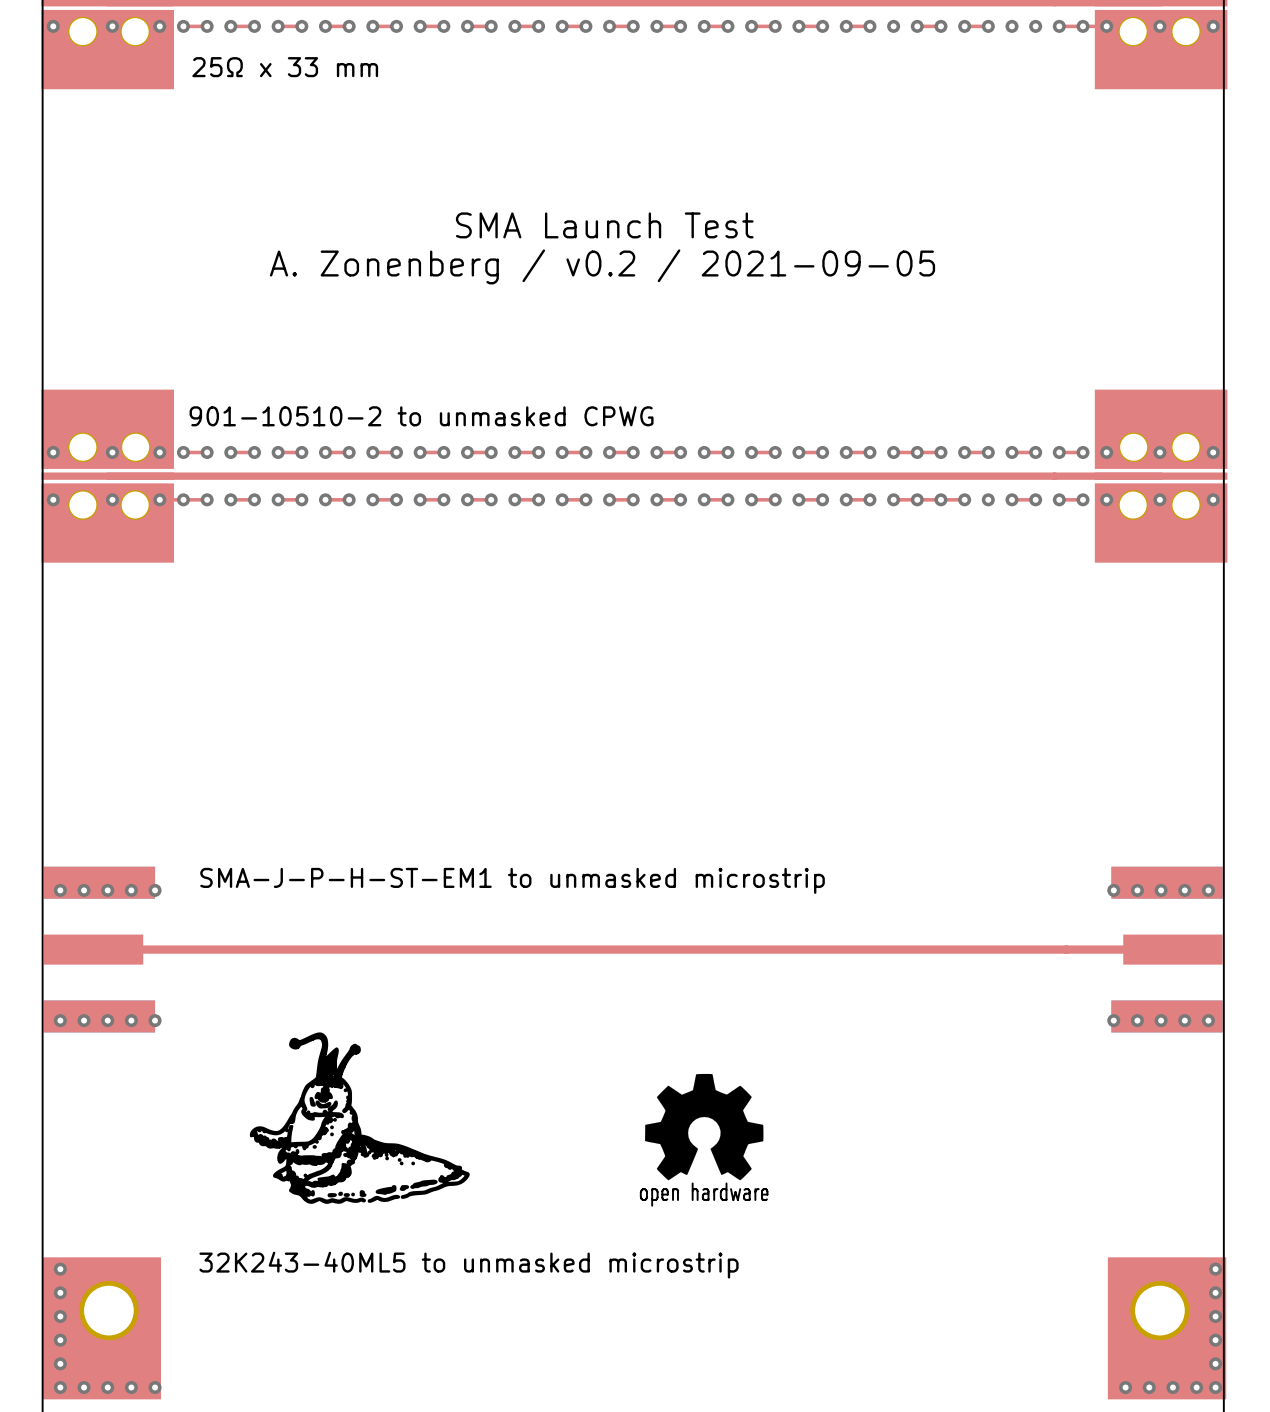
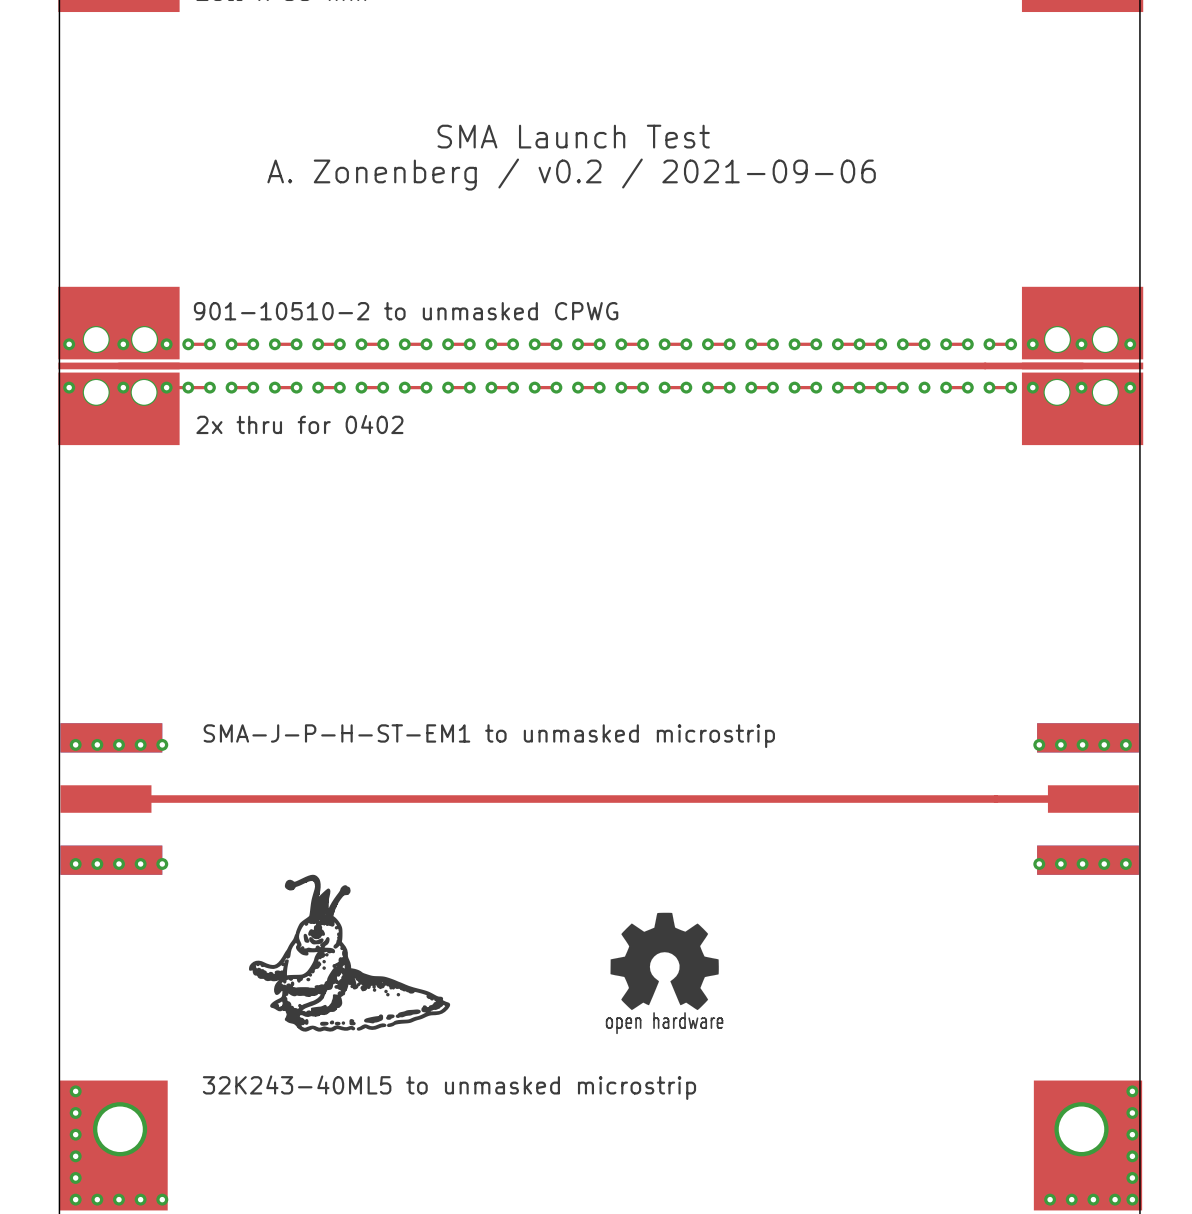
text: A. Zonenberg / v0.2 / 2021-09-05 (602, 266) -> A. Zonenberg / v0.2 / 2021-09-06 (571, 174)
text: none -> 2x thru for 0402 (299, 424)

